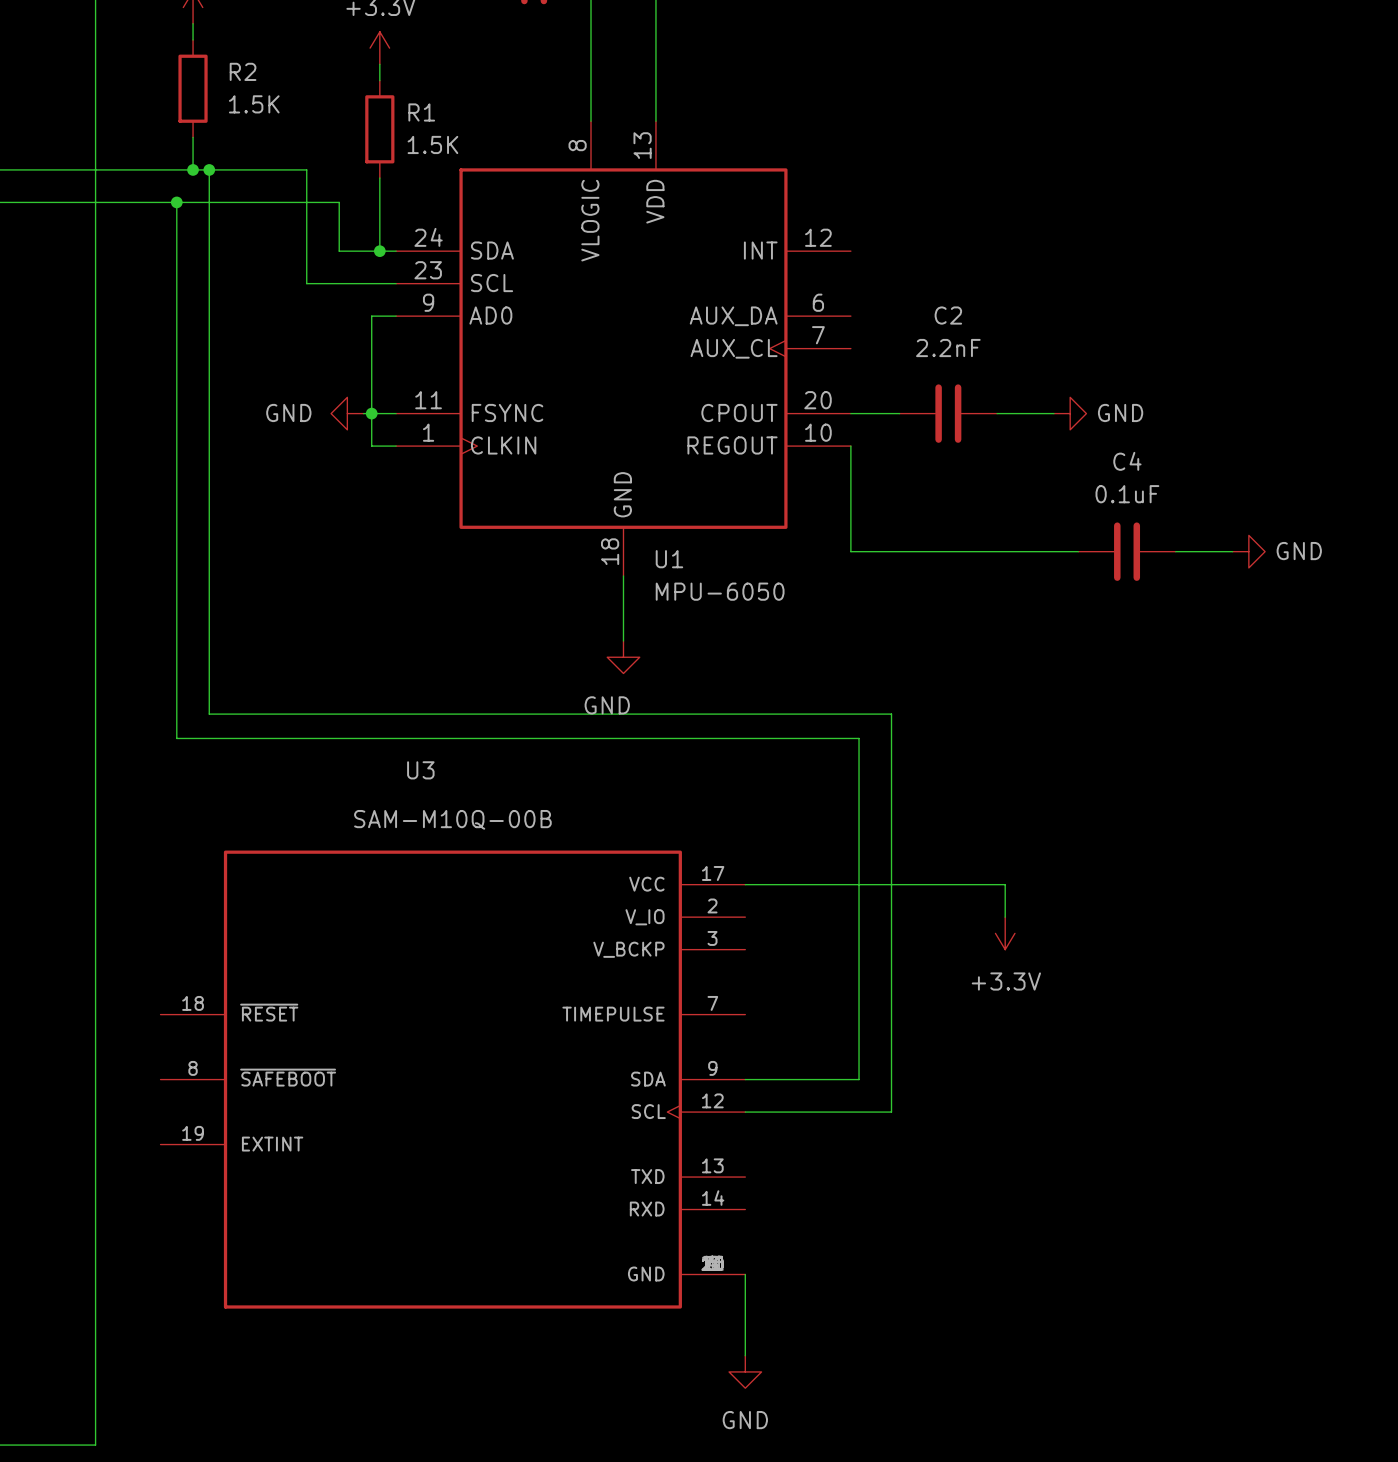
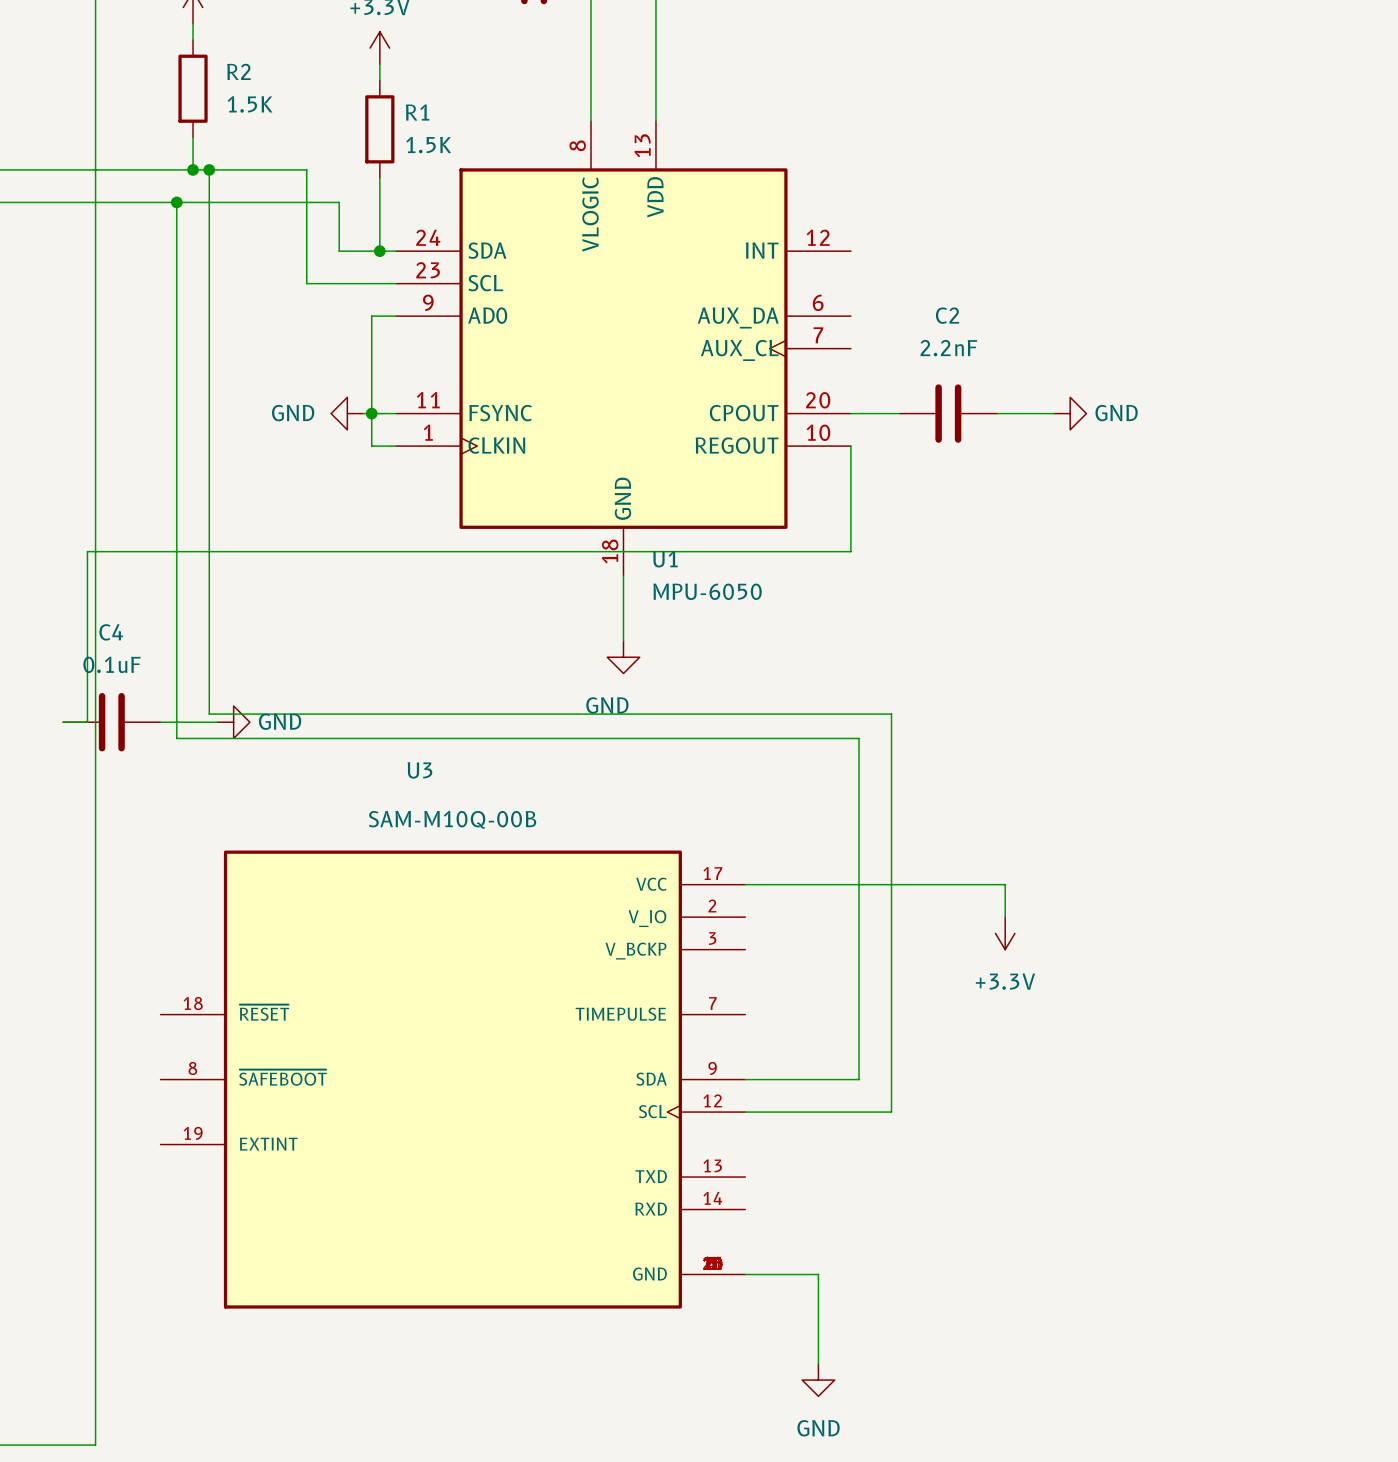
wire: (850, 551) (1078, 551) -> (850, 551) (87, 551) (87, 722) (63, 722)
C4 position: (1127, 551) -> (111, 722)
wire: (1175, 551) (1232, 551) -> none
power symbol: GND (1248, 551) -> none
wire: none -> (160, 722) (217, 722)
power symbol: none -> GND (233, 722)
wire: (745, 1274) (745, 1355) -> (745, 1274) (818, 1274) (818, 1363)
power symbol position: GND (745, 1371) -> GND (818, 1380)

